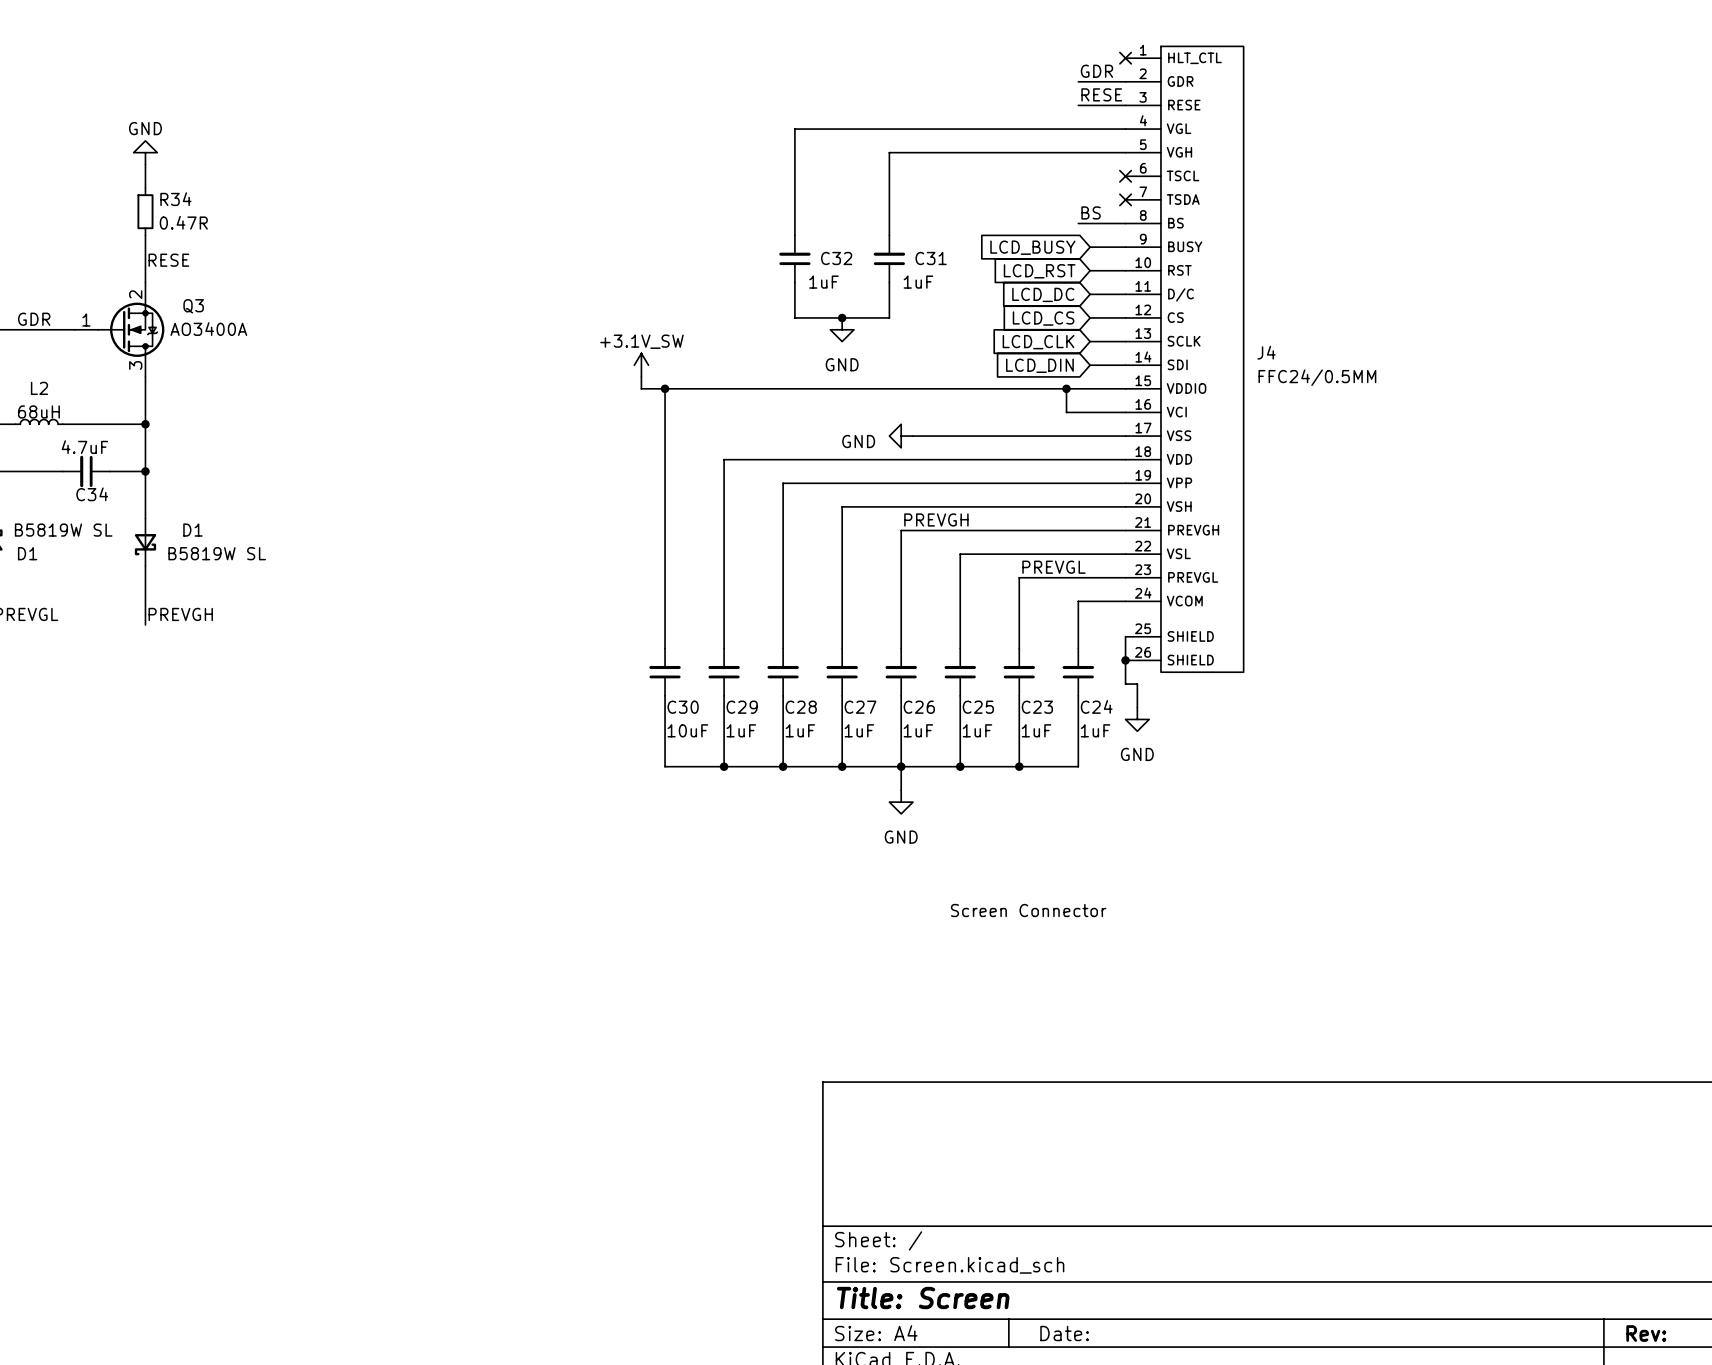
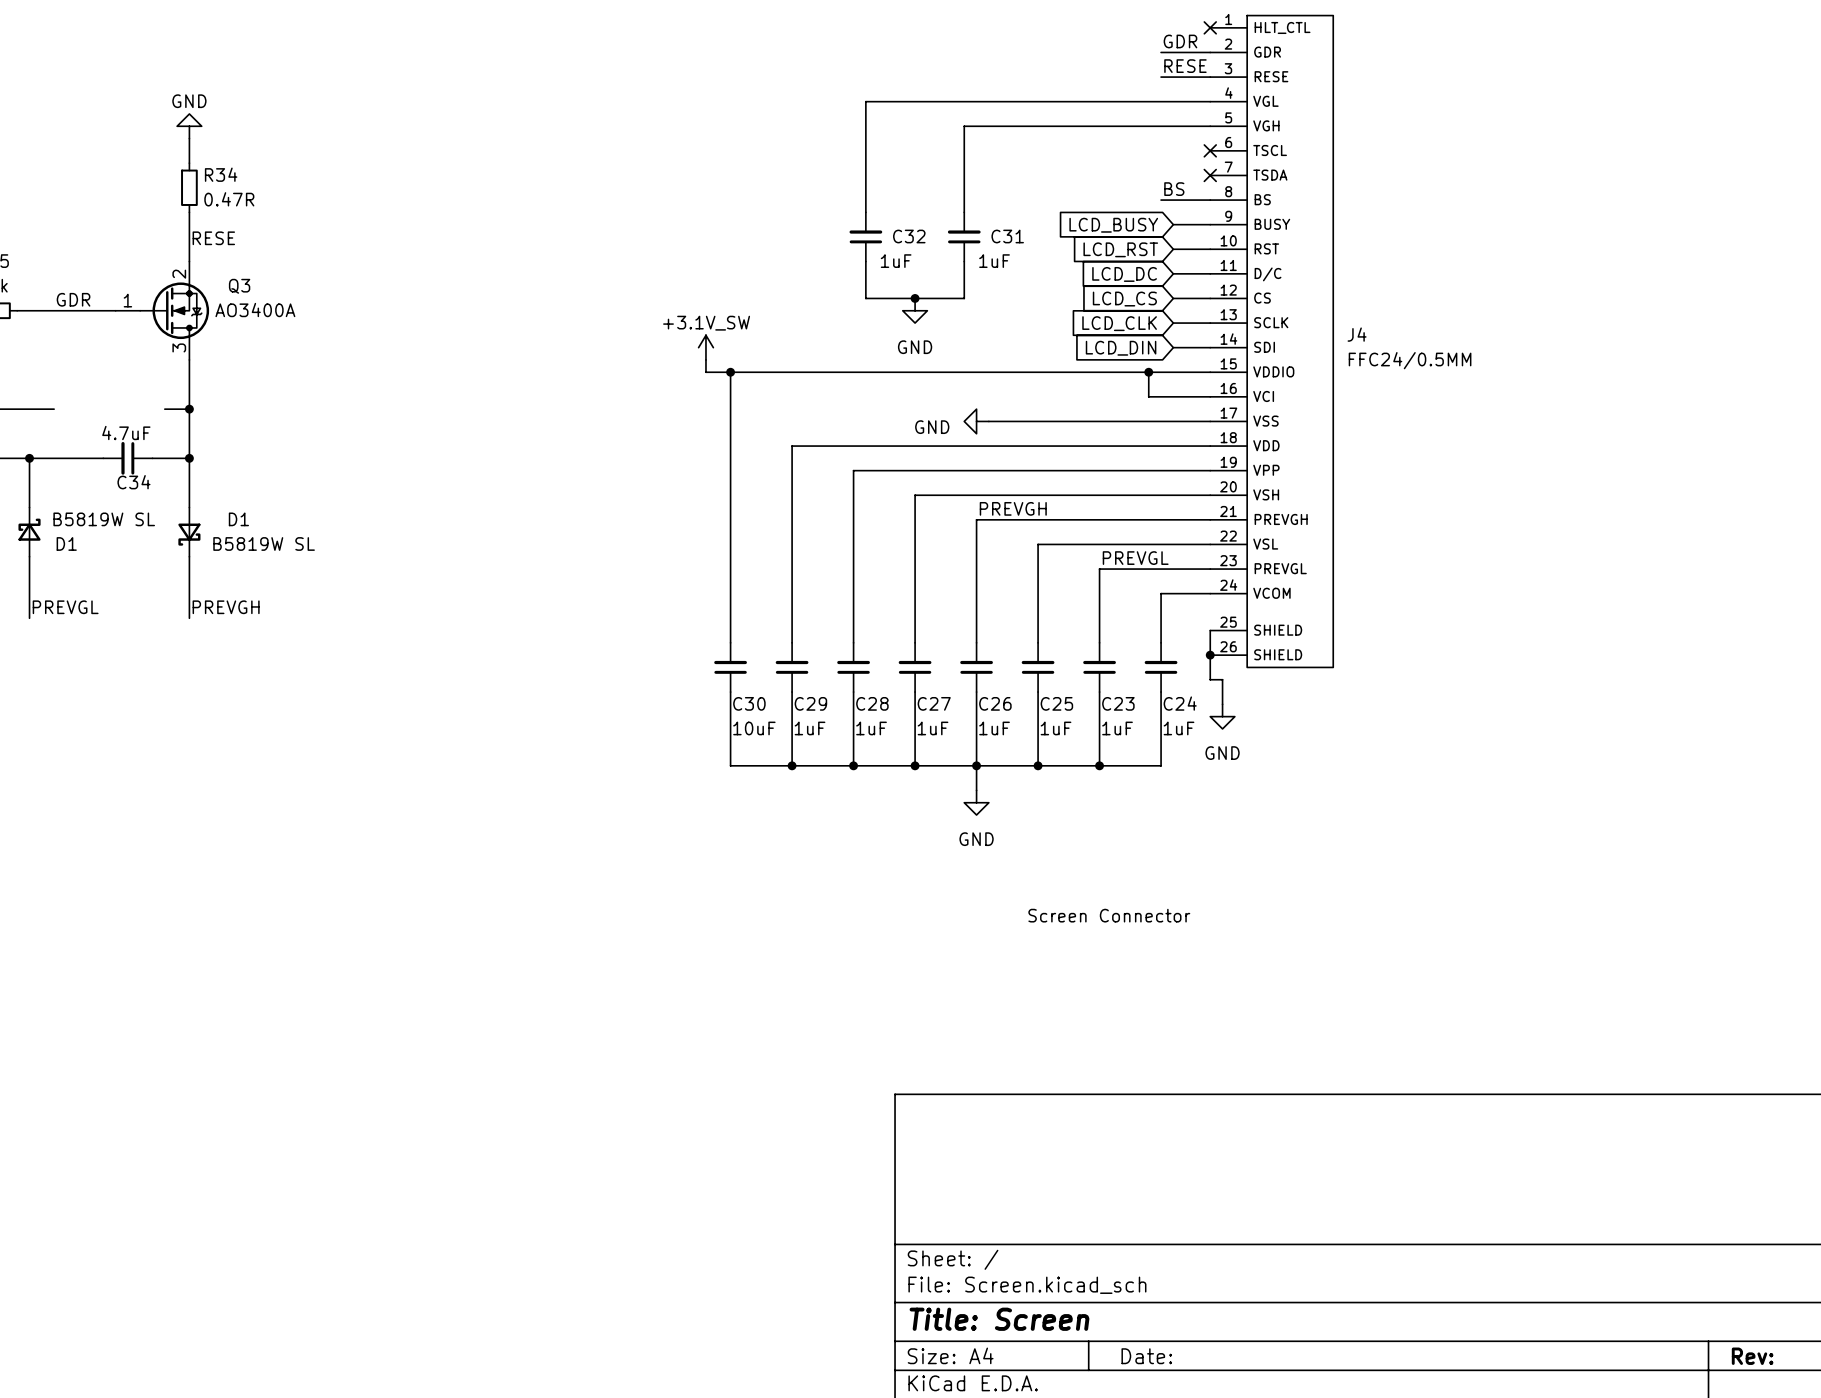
L2: 68uH (39, 421) -> none
wire: (62, 424) (121, 424) -> none

